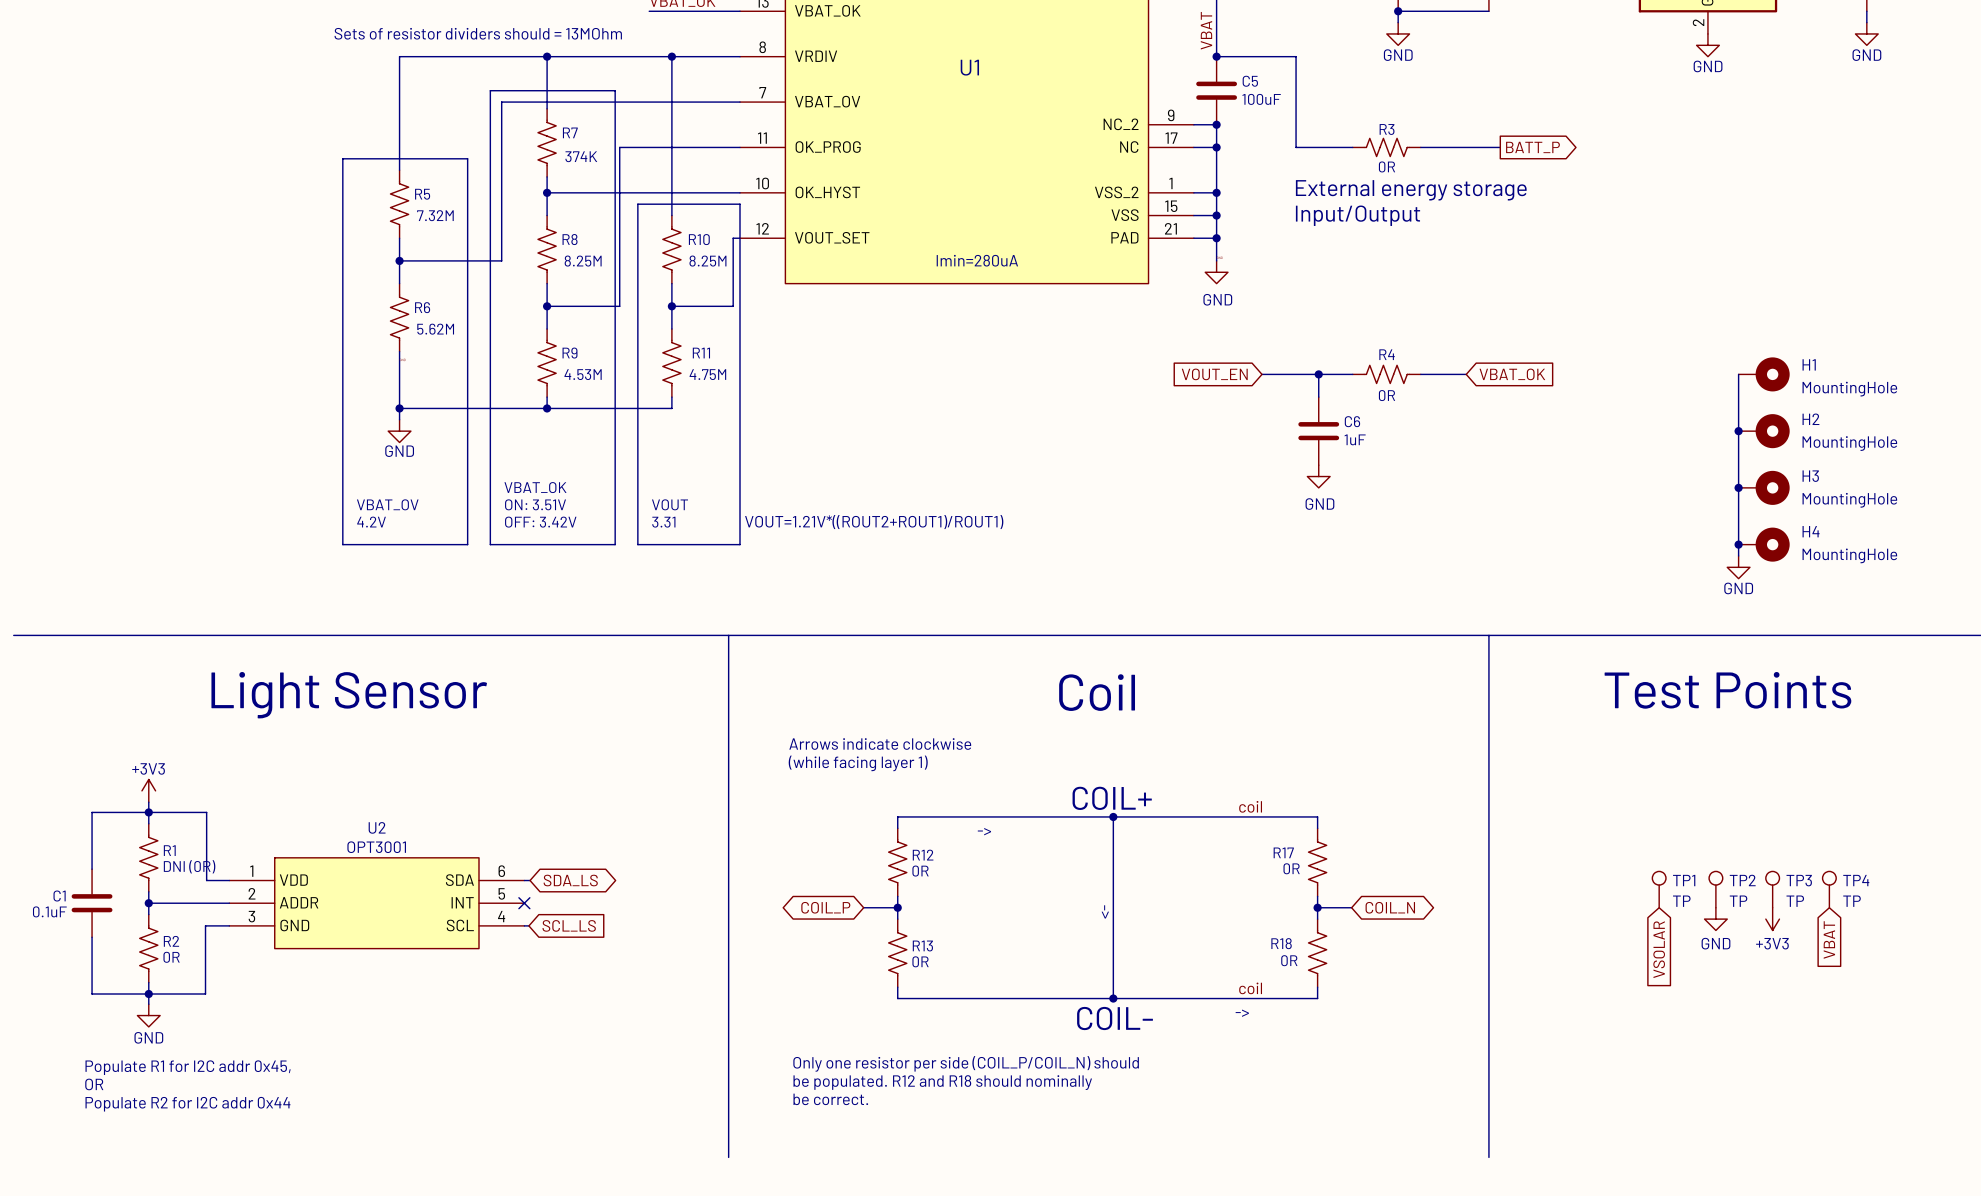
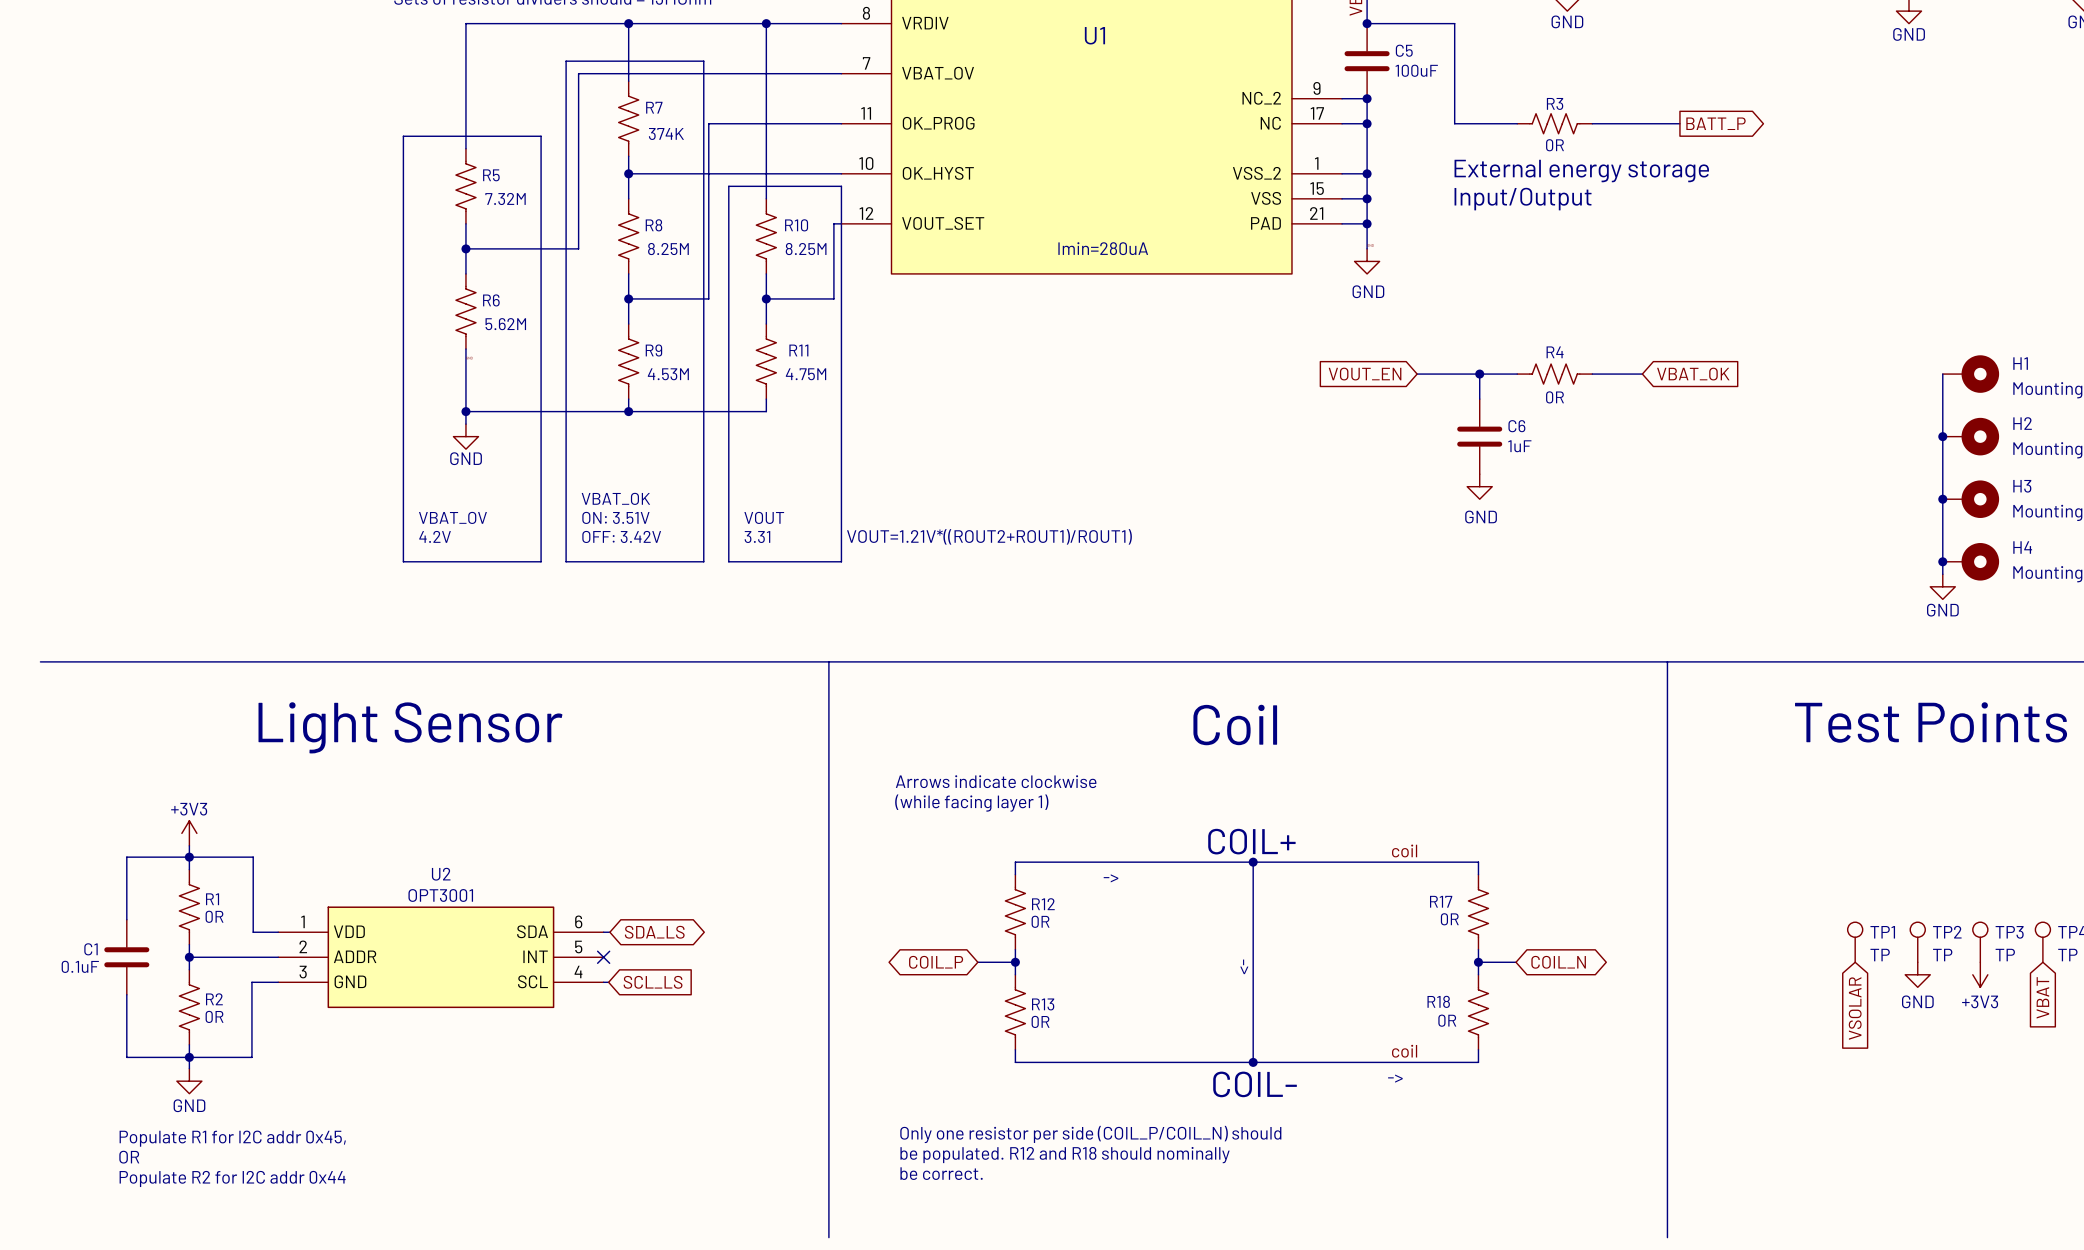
R1 value: DNI (0R) (189, 866) -> 0R (214, 916)

